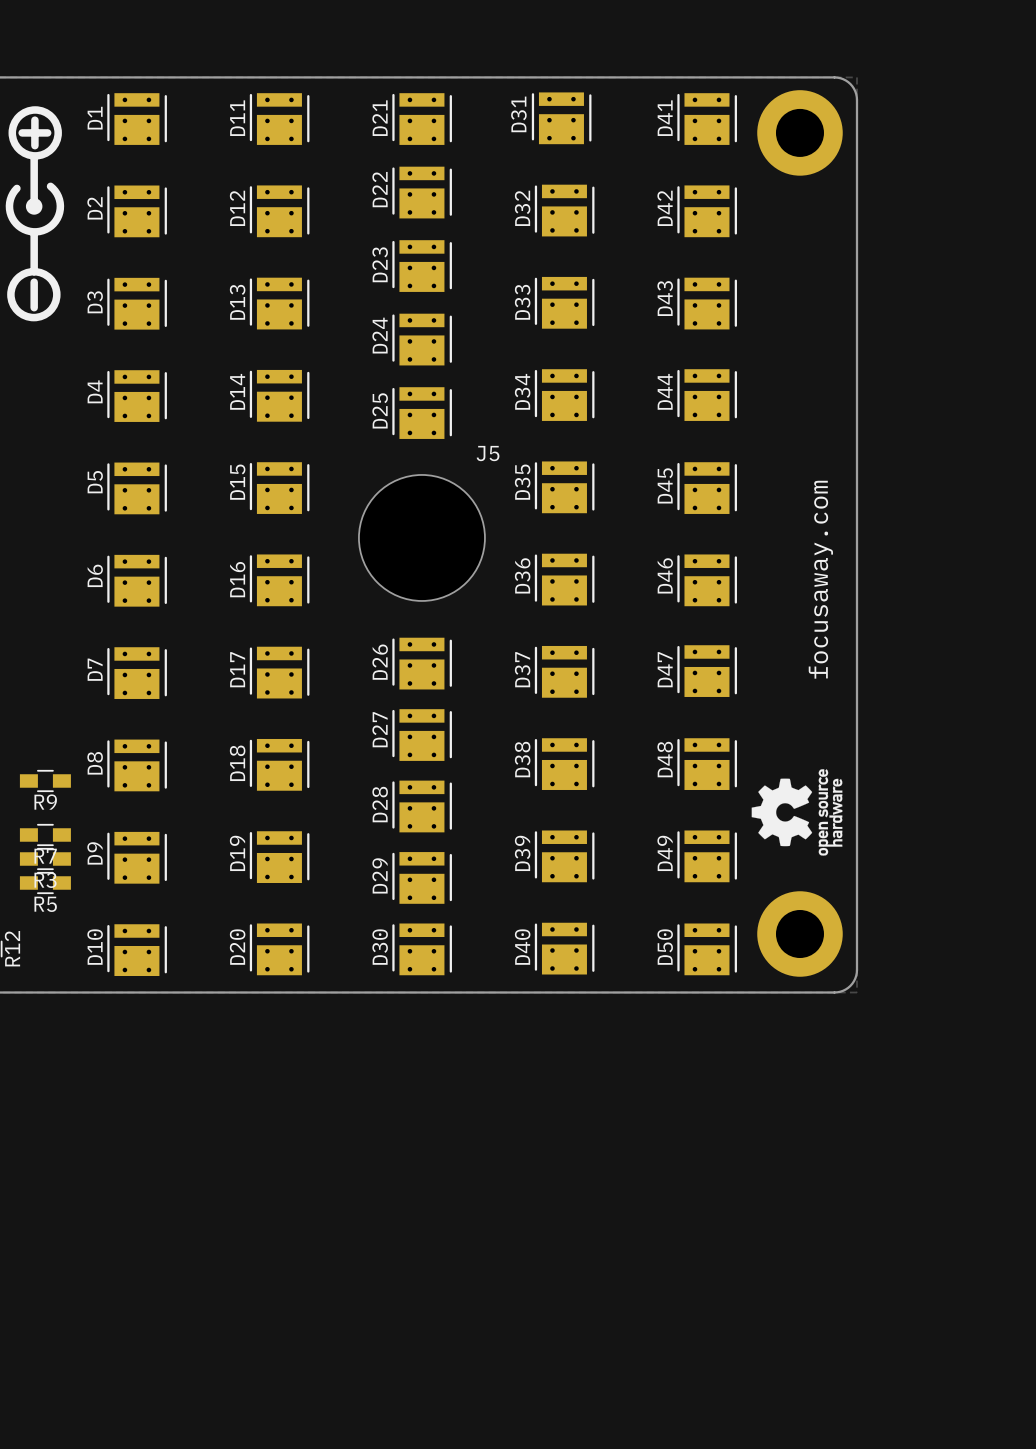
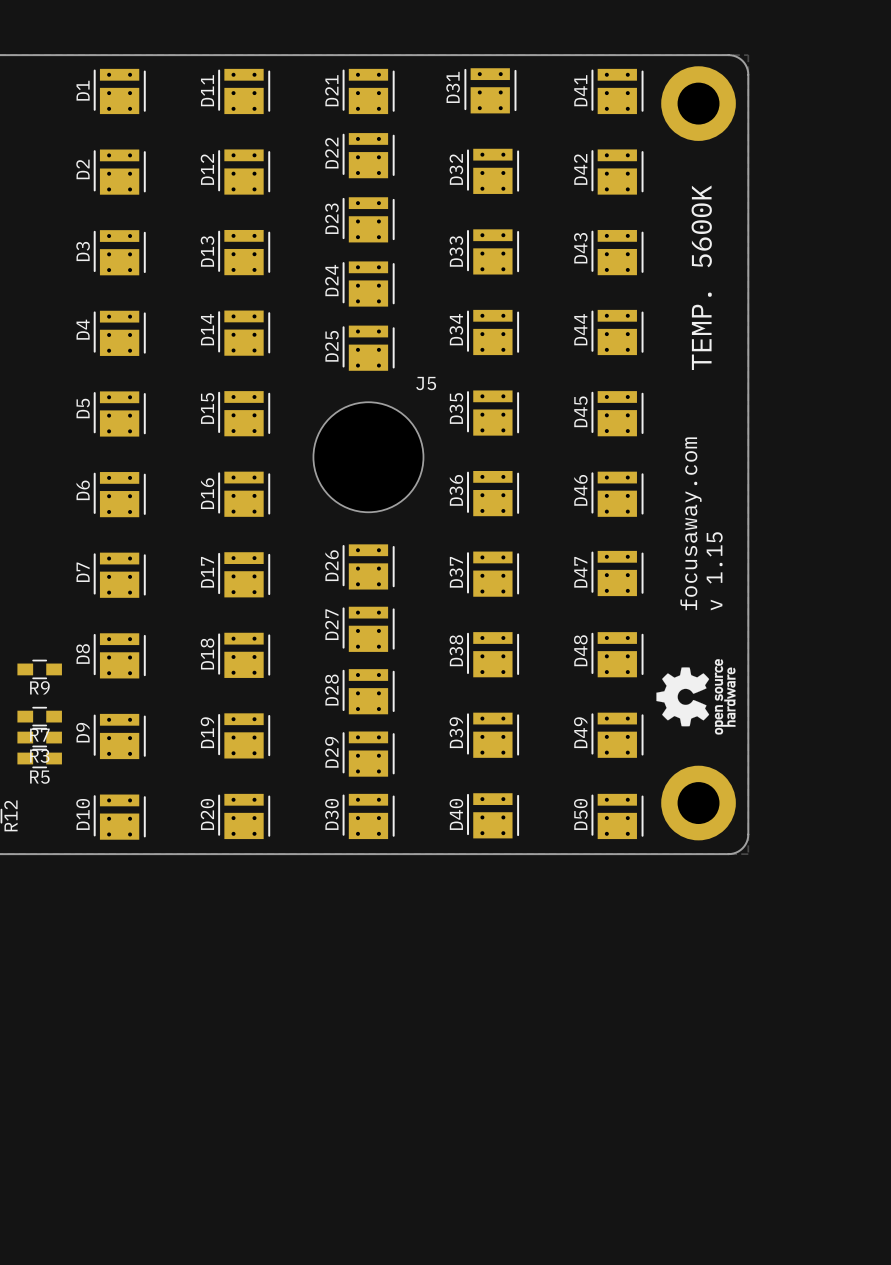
drawing: [5, 106, 65, 322] -> none
text: none -> TEMP. 5600K (701, 277)
text position: focusaway.com (820, 579) -> focusaway.com (691, 523)
text: none -> v 1.15 (714, 571)

